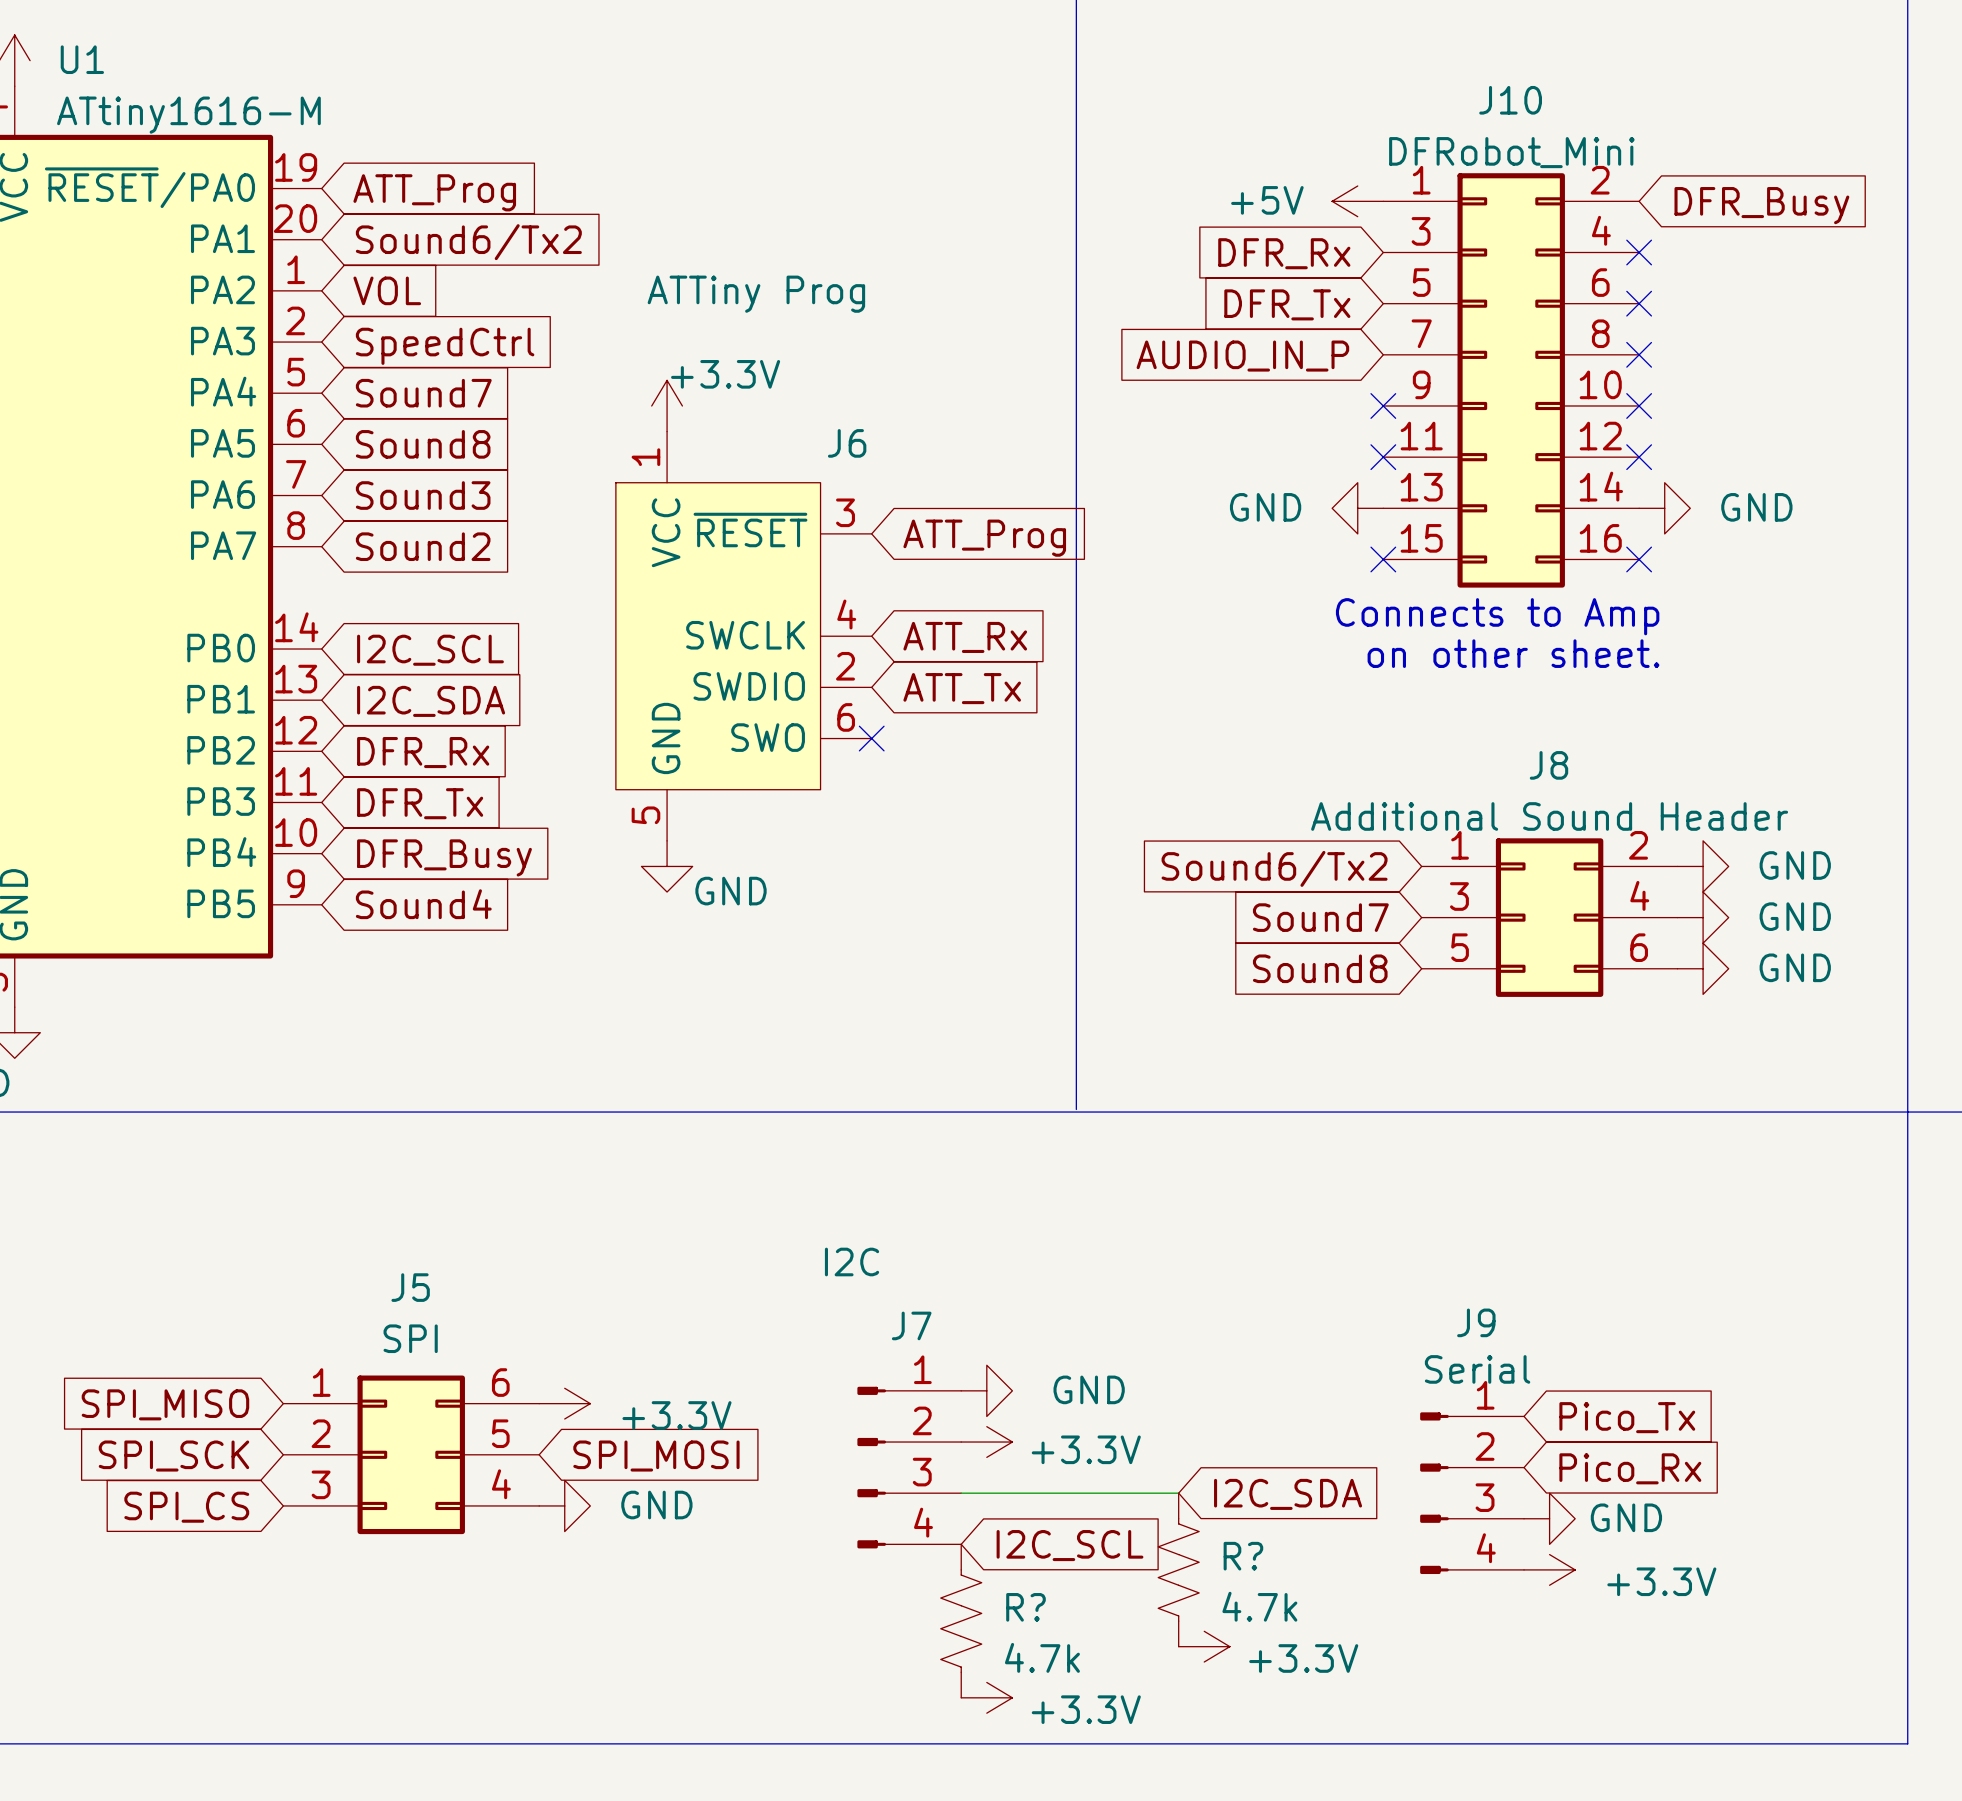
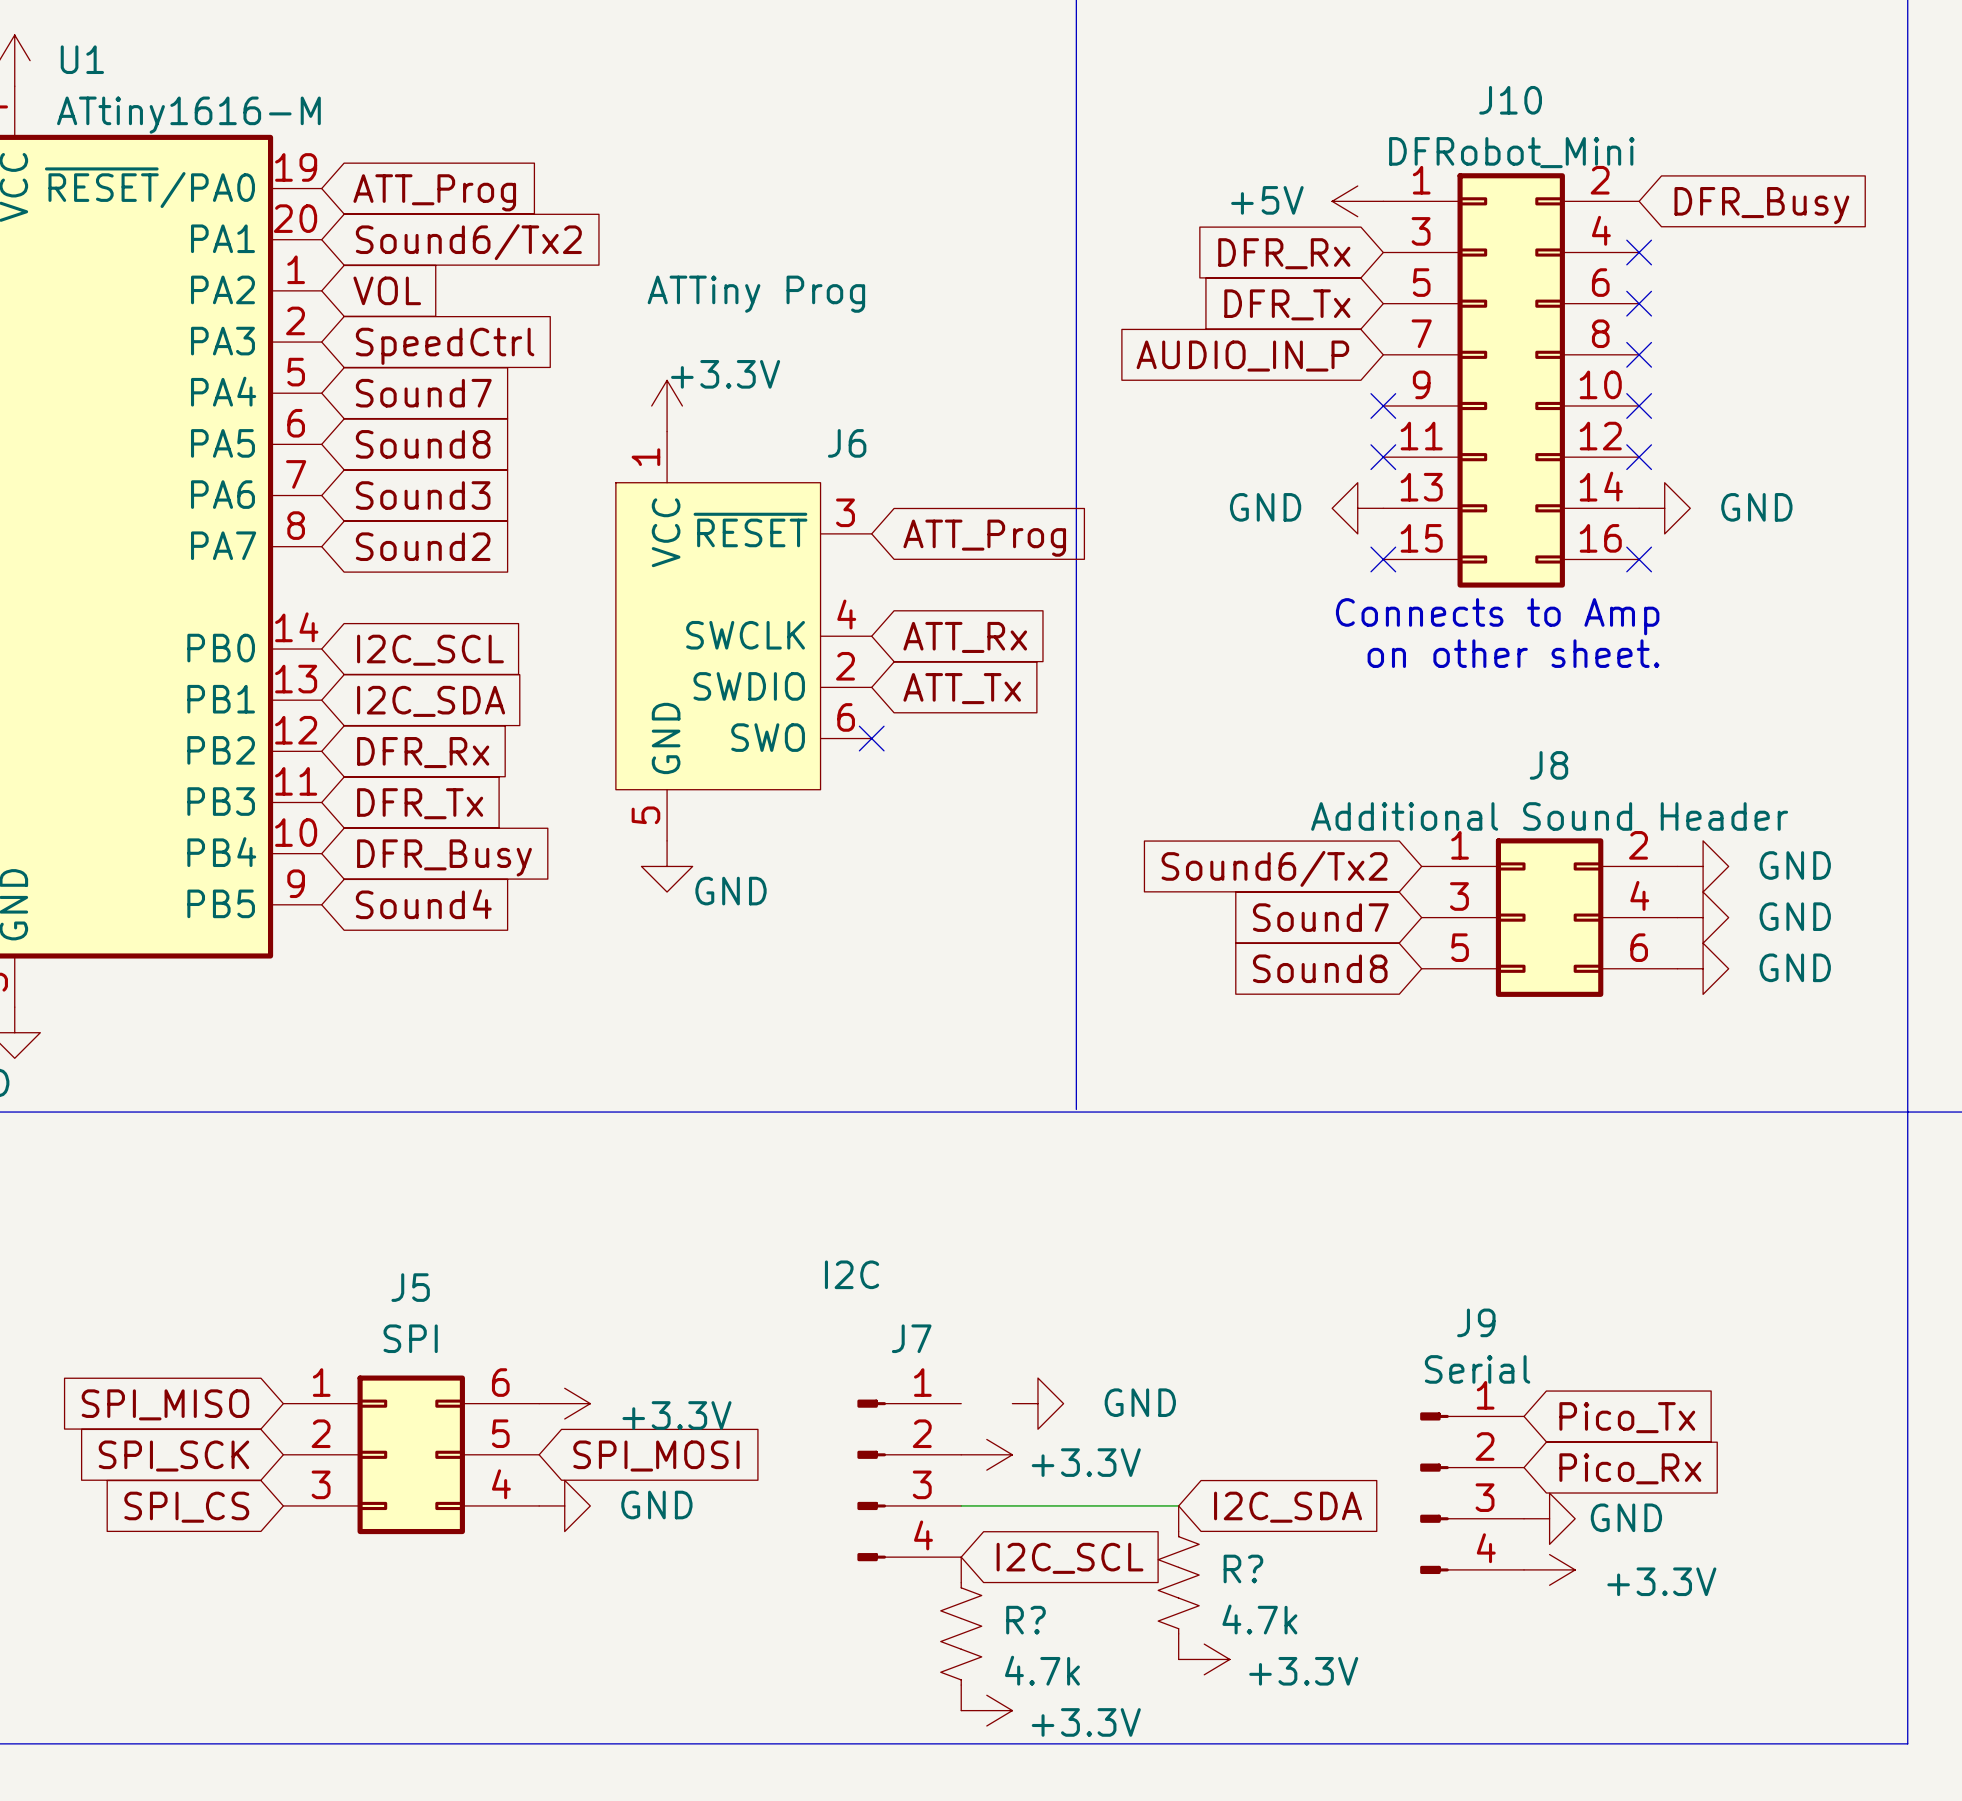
power symbol position: GND (986, 1390) -> GND (1037, 1403)
power symbol position: +3.3V (986, 1442) -> +3.3V (986, 1454)
J7 position: (909, 1467) -> (909, 1480)
wire: (961, 1493) (1178, 1493) -> (961, 1505) (1178, 1505)
global label position: I2C_SDA (1288, 1494) -> I2C_SDA (1288, 1507)
global label position: I2C_SCL (1069, 1545) -> I2C_SCL (1069, 1558)
R? position: (1178, 1569) -> (1178, 1582)
R? position: (961, 1621) -> (961, 1633)
power symbol position: +3.3V (1204, 1646) -> +3.3V (1204, 1659)
power symbol position: +3.3V (986, 1697) -> +3.3V (986, 1710)

